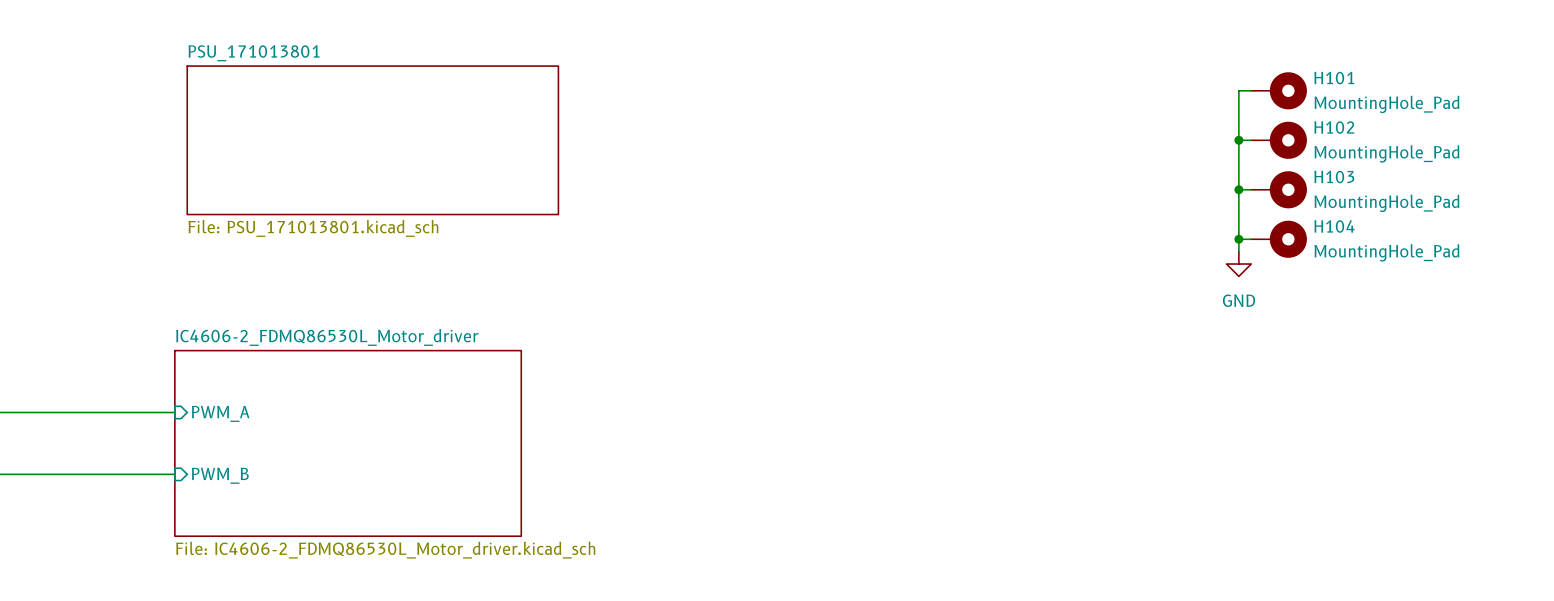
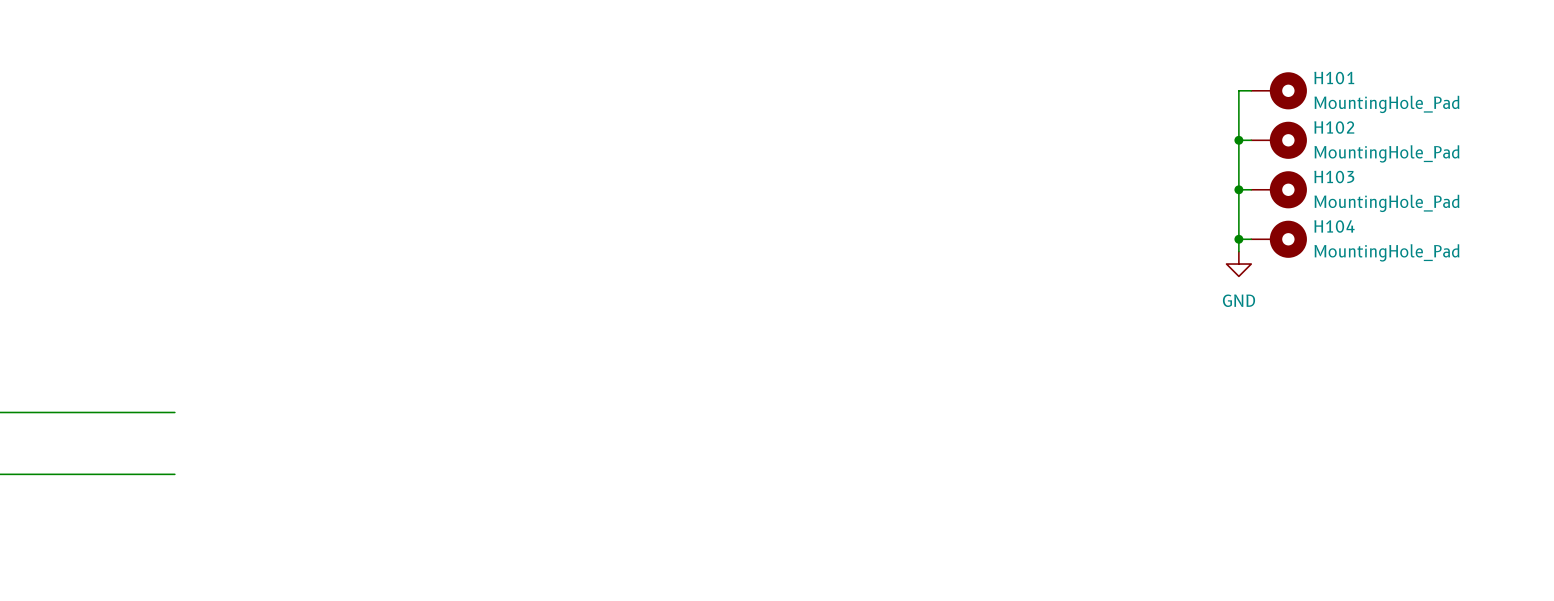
sheet PSU_171013801: File: PSU_171013801.kicad_sch (372, 140) -> none
sheet pin: PWM_A (220, 413) -> none
sheet IC4606-2_FDMQ86530L_Motor_driver: File: IC4606-2_FDMQ86530L_Motor_driver.kicad_sch (348, 443) -> none
sheet pin: PWM_B (220, 475) -> none

